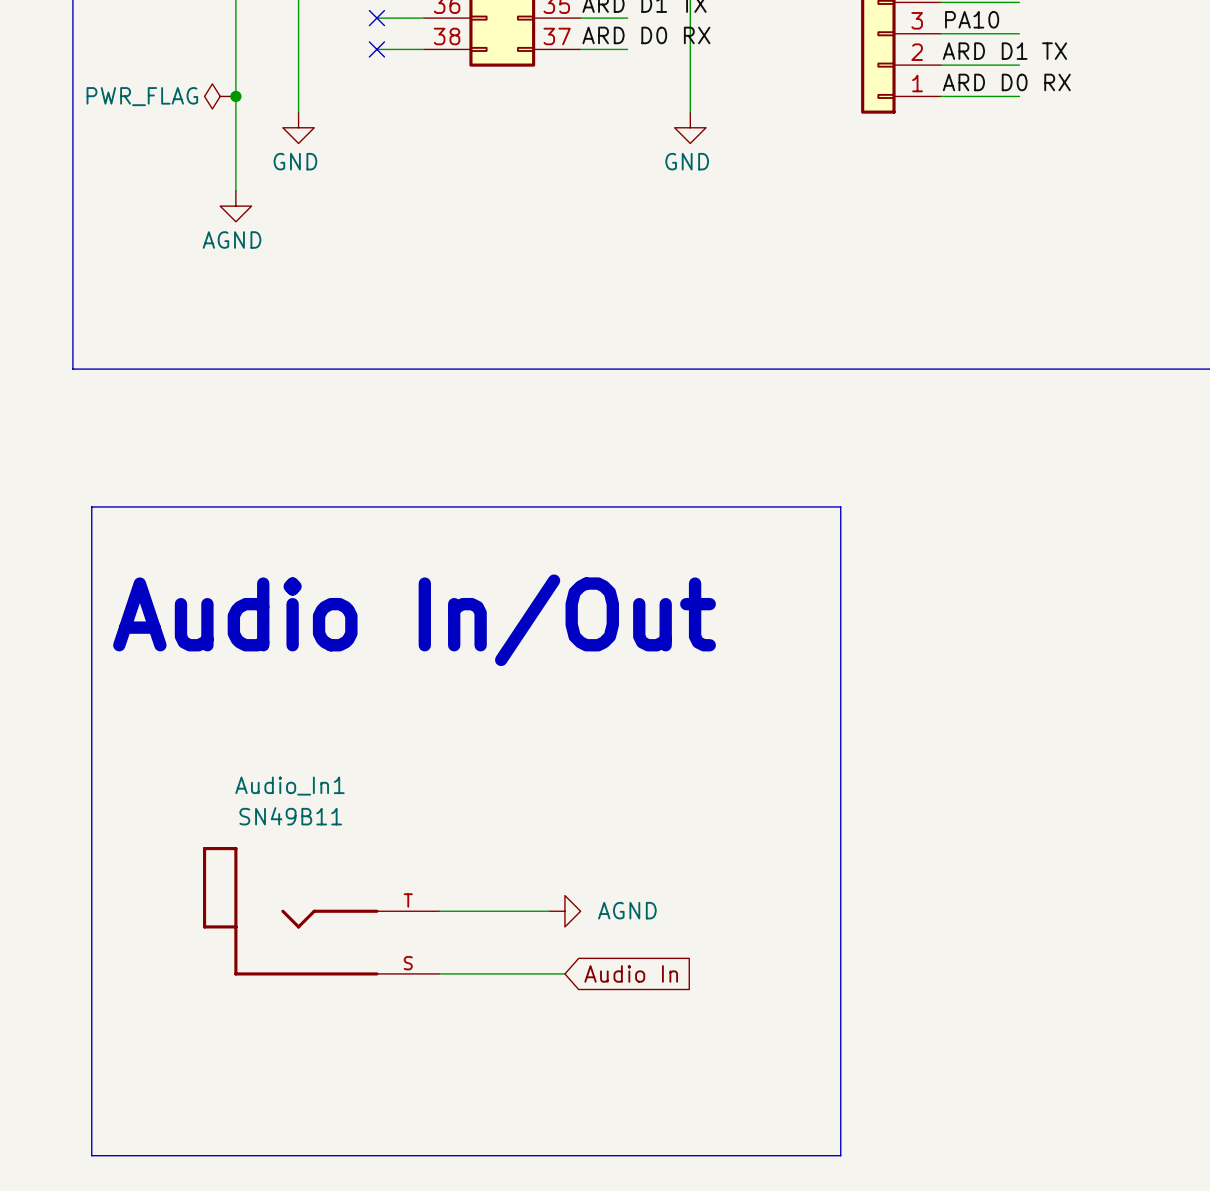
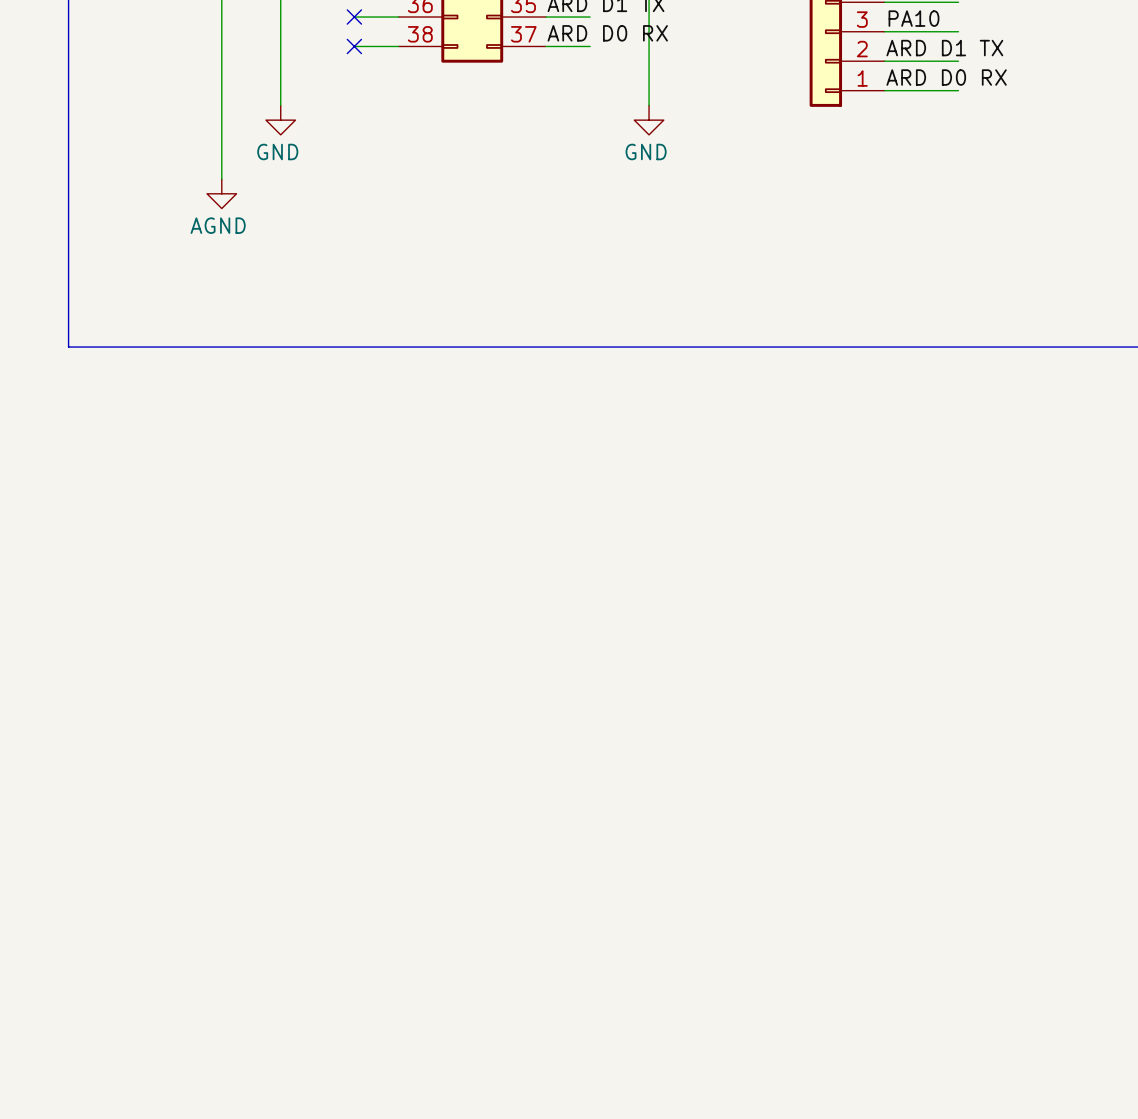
power symbol: PWR_FLAG (220, 96) -> none
junction: (235, 96) -> none
line: (91, 506) (840, 506) (840, 1155) (91, 1155) (91, 506) -> none
text: Audio In/Out (414, 620) -> none
Audio_In1: SN49B11 (321, 911) -> none
wire: (439, 911) (549, 911) -> none
power symbol: AGND (564, 911) -> none
wire: (439, 973) (564, 973) -> none
global label: Audio In (631, 973) -> none

